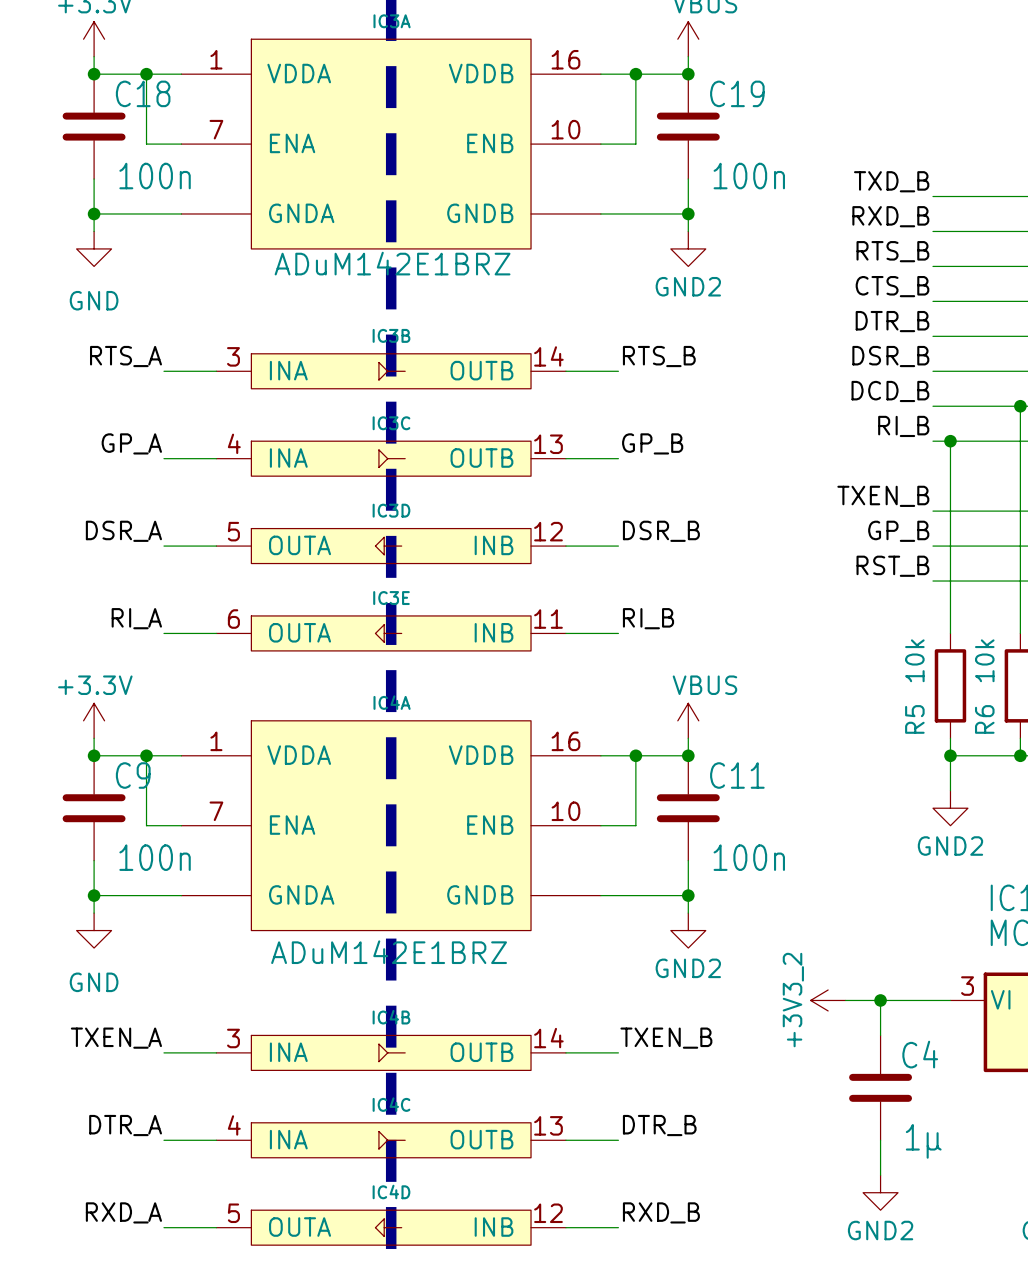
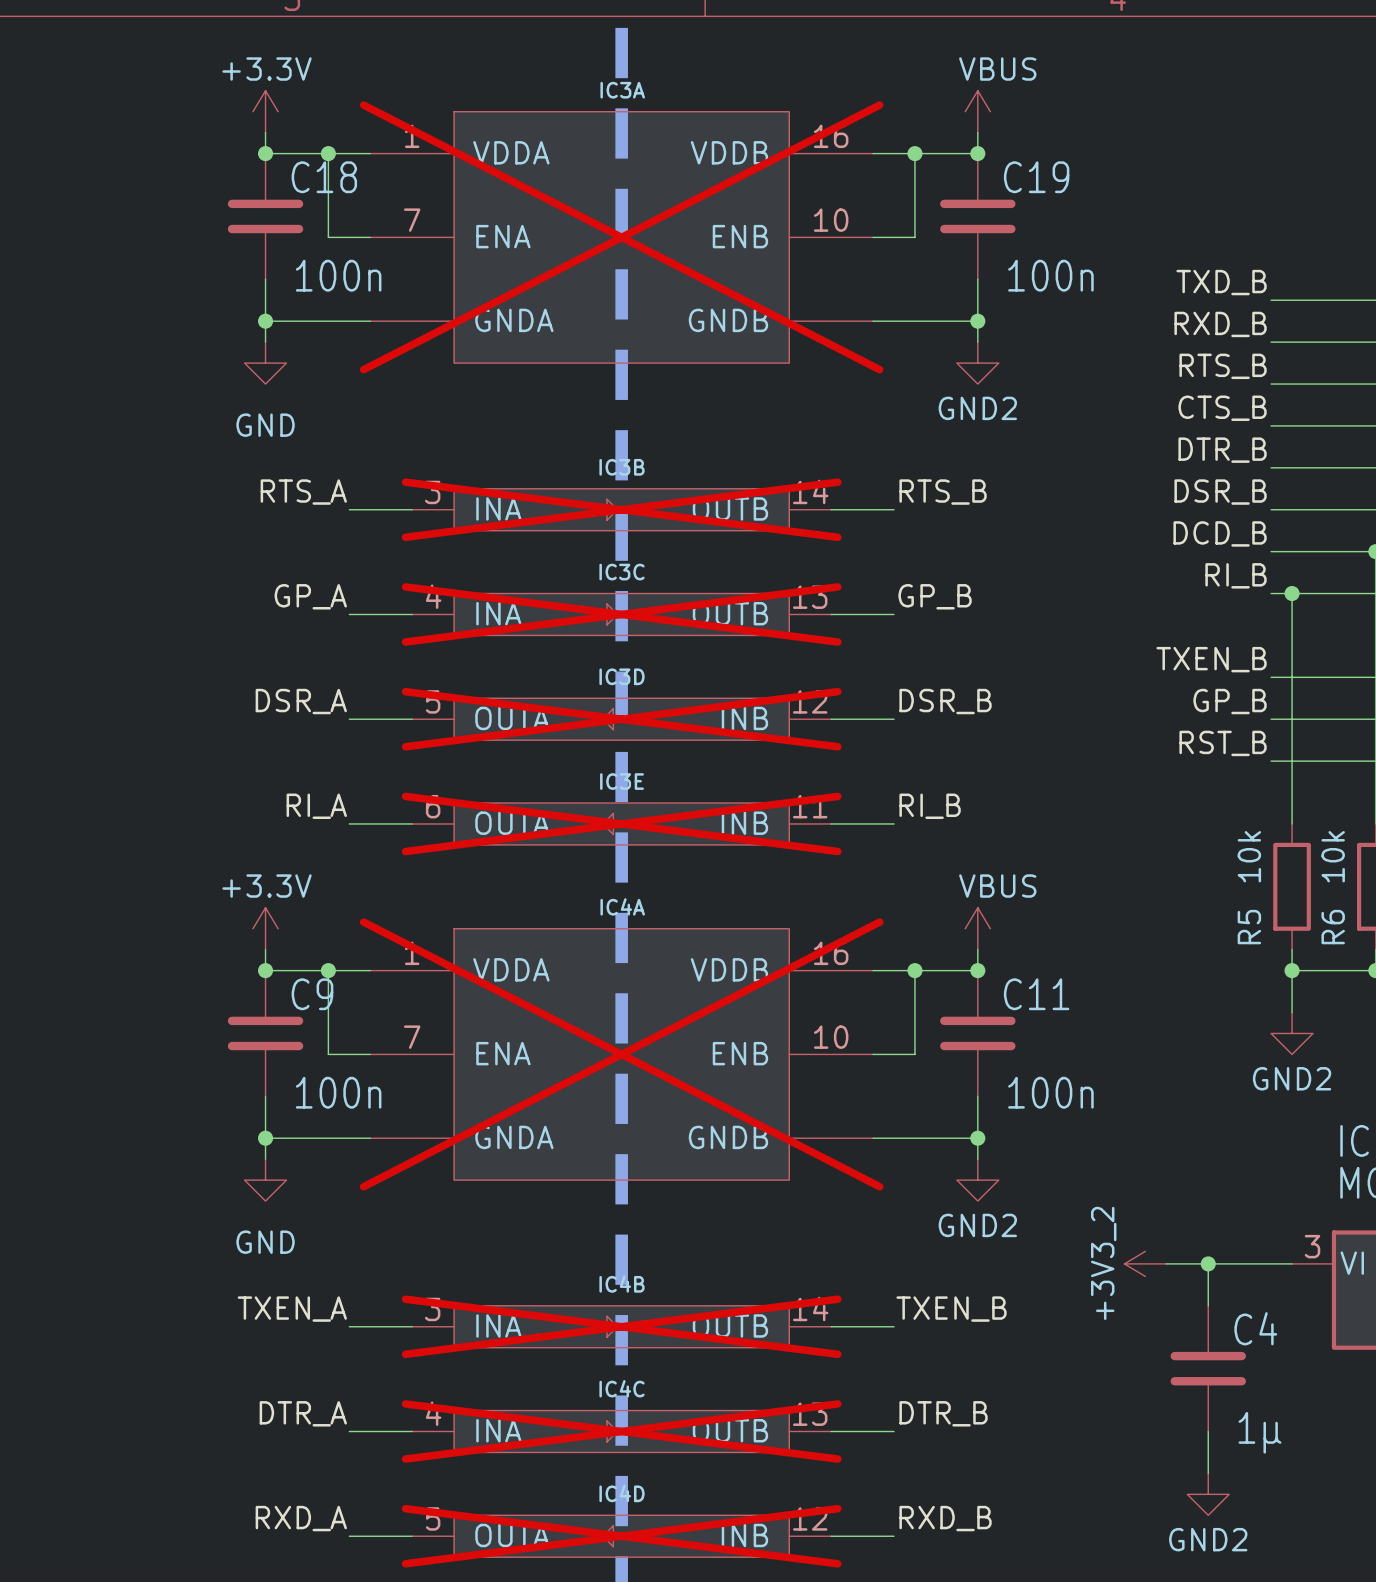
IC3A do-not-place cross: none -> (621, 237)
IC3A value: ADuM142E1BRZ (392, 263) -> none
IC3B do-not-place cross: none -> (621, 509)
IC3C do-not-place cross: none -> (621, 614)
IC3D do-not-place cross: none -> (621, 719)
IC3E do-not-place cross: none -> (621, 823)
IC4A do-not-place cross: none -> (621, 1054)
IC4A value: ADuM142E1BRZ (389, 952) -> none
IC4B do-not-place cross: none -> (621, 1326)
IC4C do-not-place cross: none -> (621, 1431)
IC4D do-not-place cross: none -> (621, 1536)

